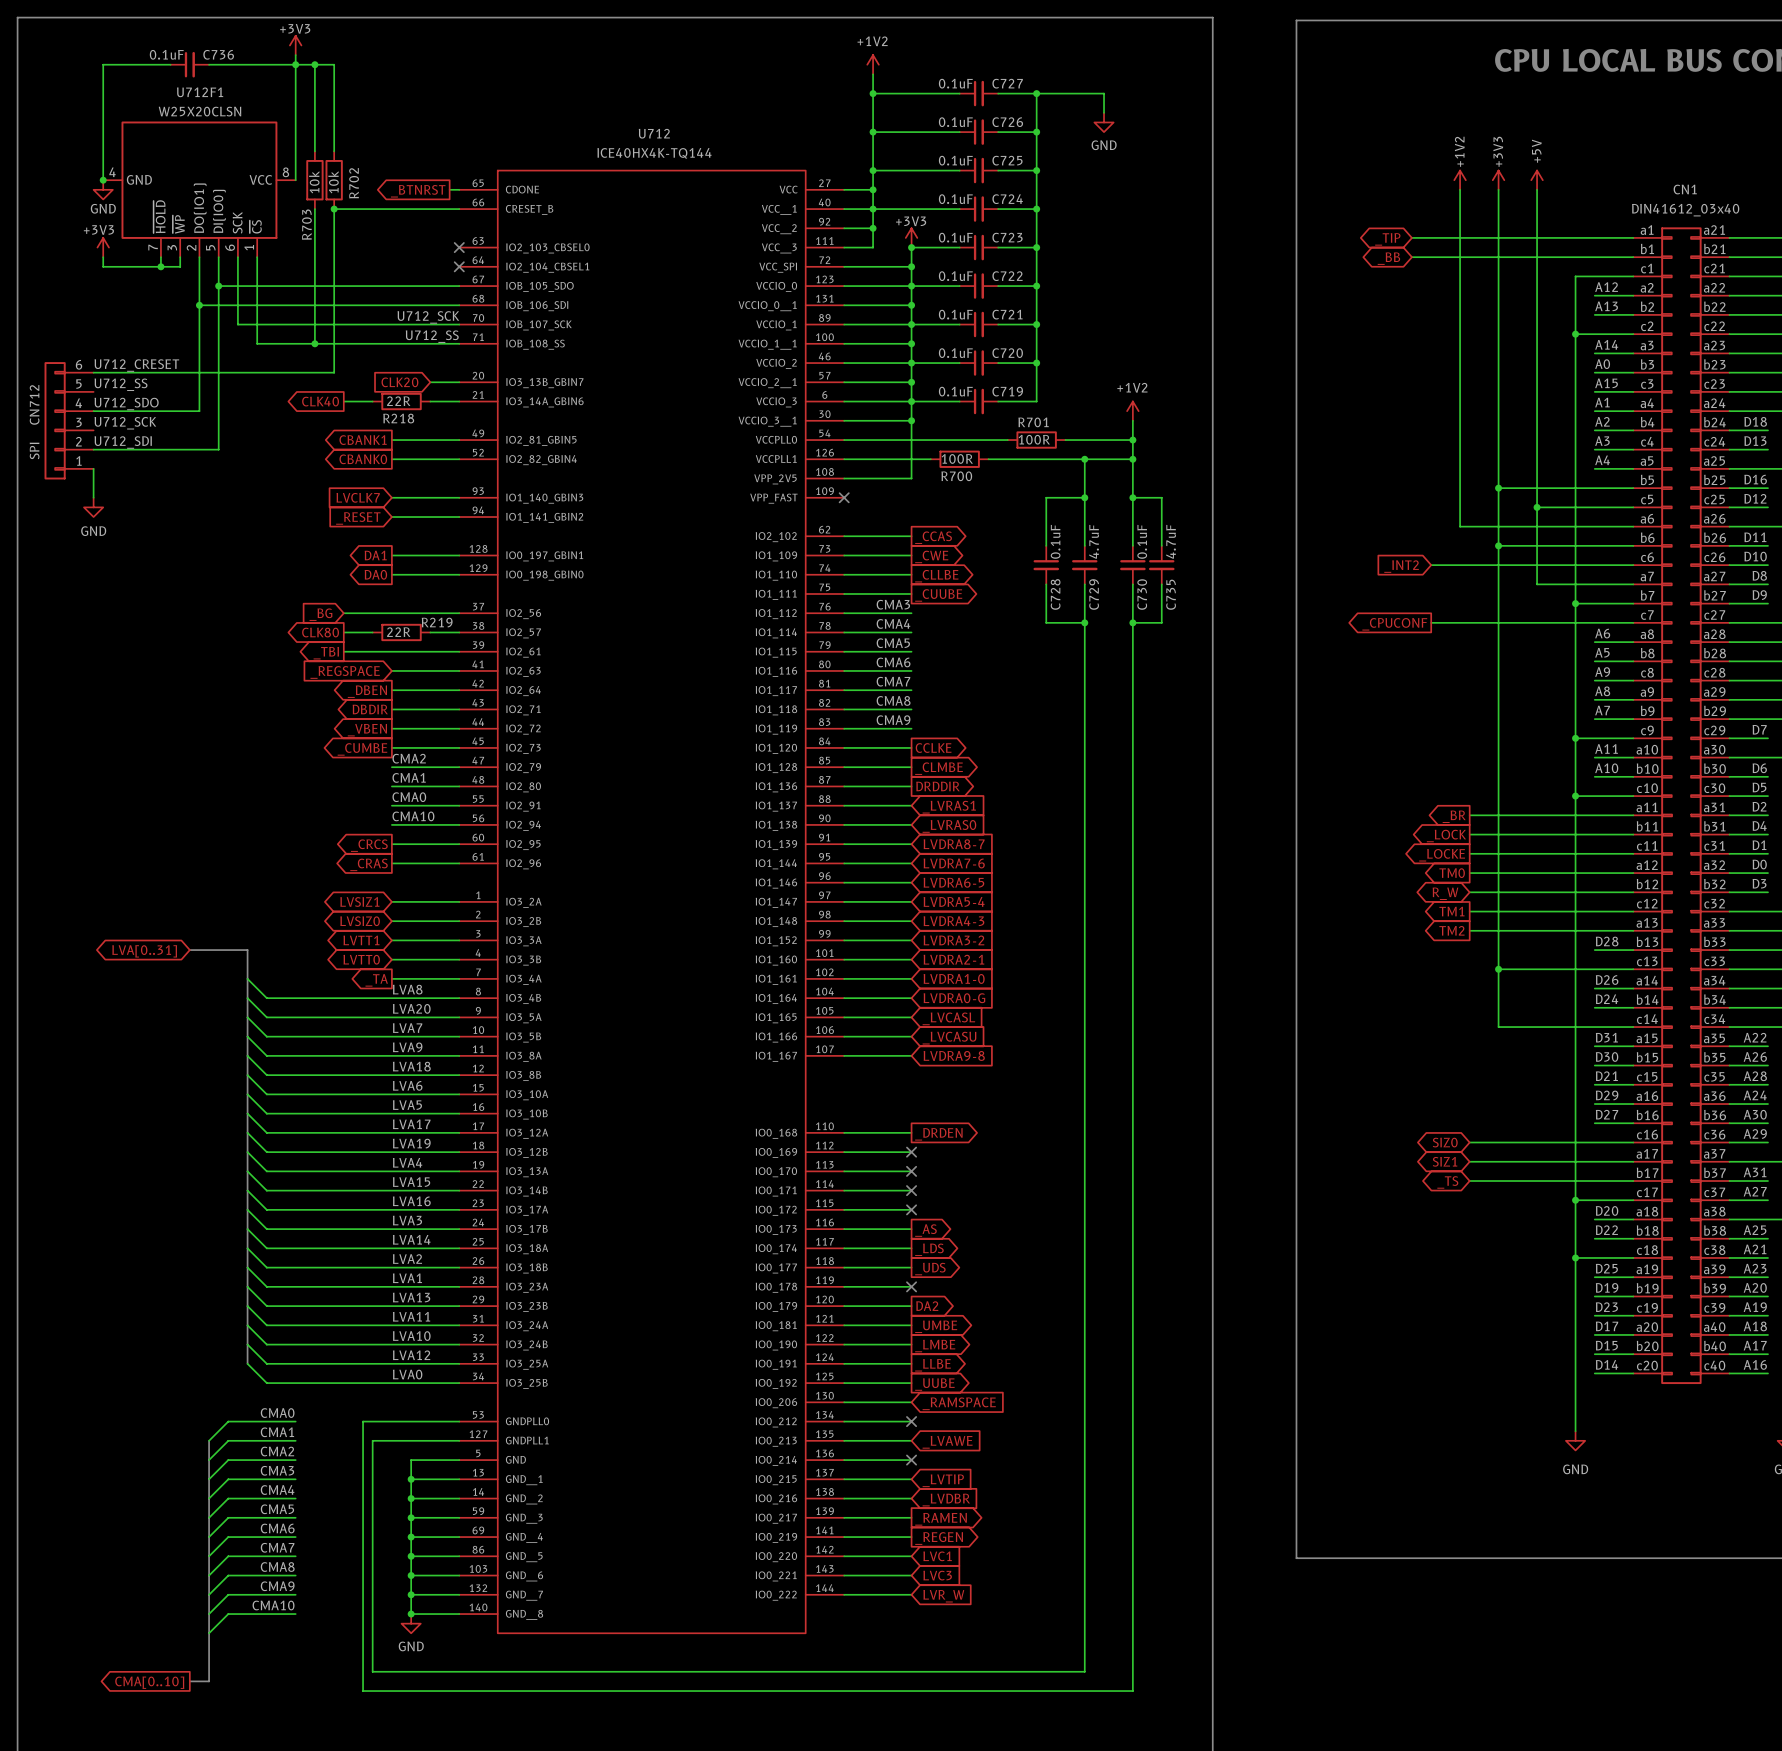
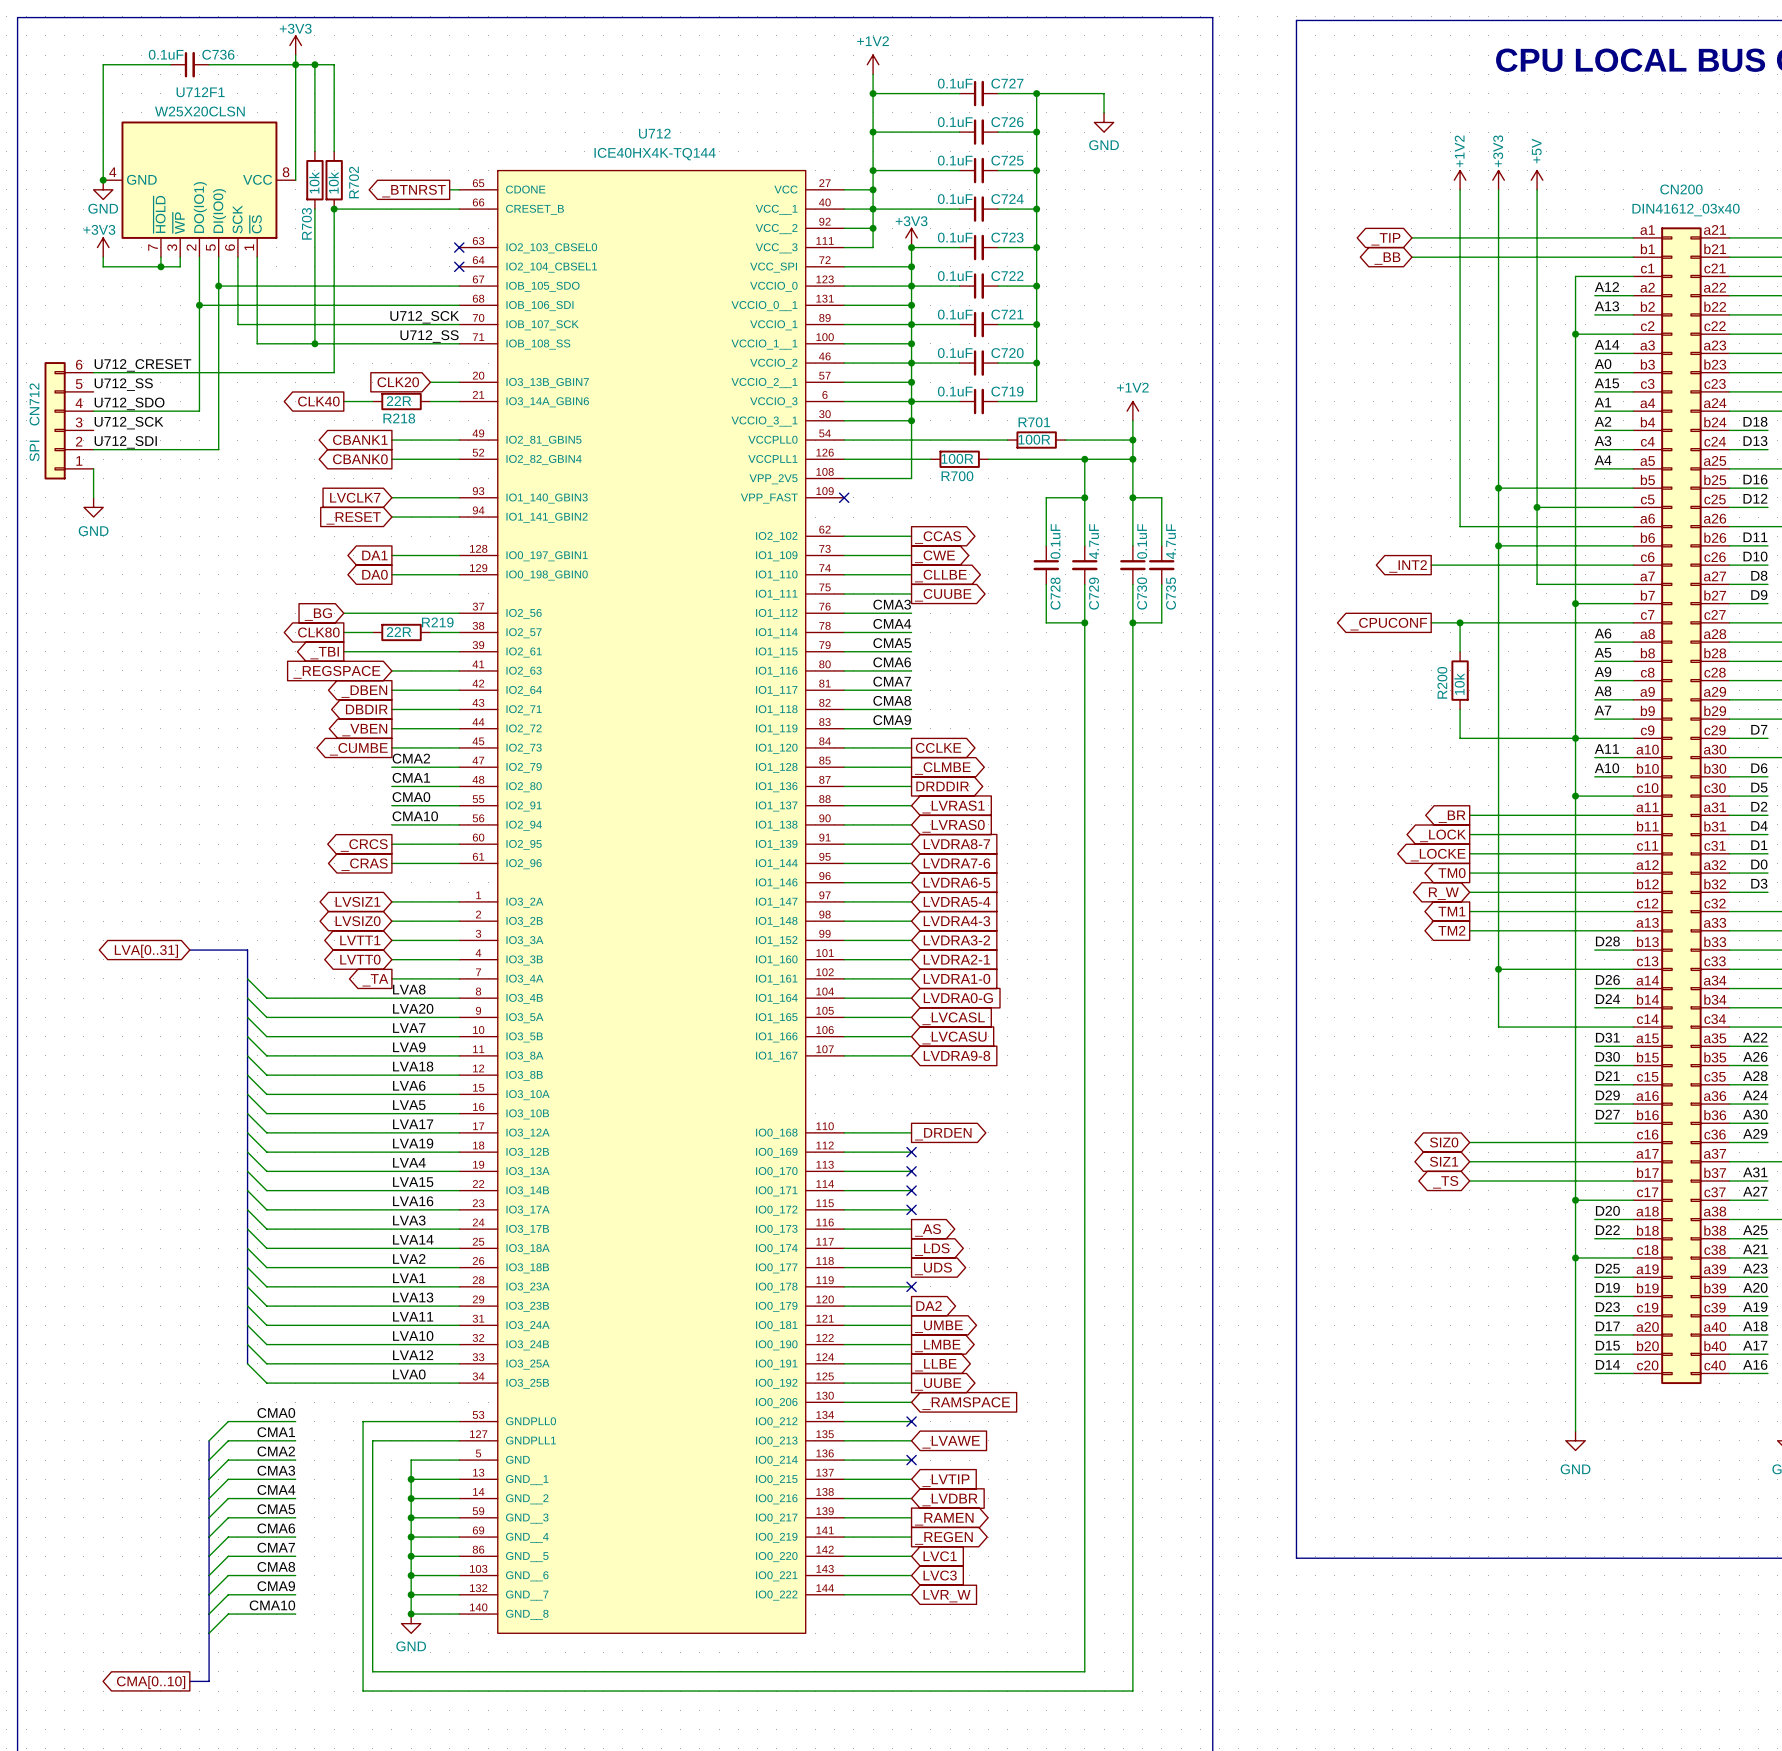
CN1 name: CN1 (1685, 189) -> CN200 (1681, 189)
global label shape: input (1401, 566) -> output (1408, 566)
wire: none -> (1460, 622) (1460, 651)
junction: none -> (1460, 622)
R200: none -> 10k (1460, 680)
wire: none -> (1460, 709) (1460, 738) (1575, 738)

